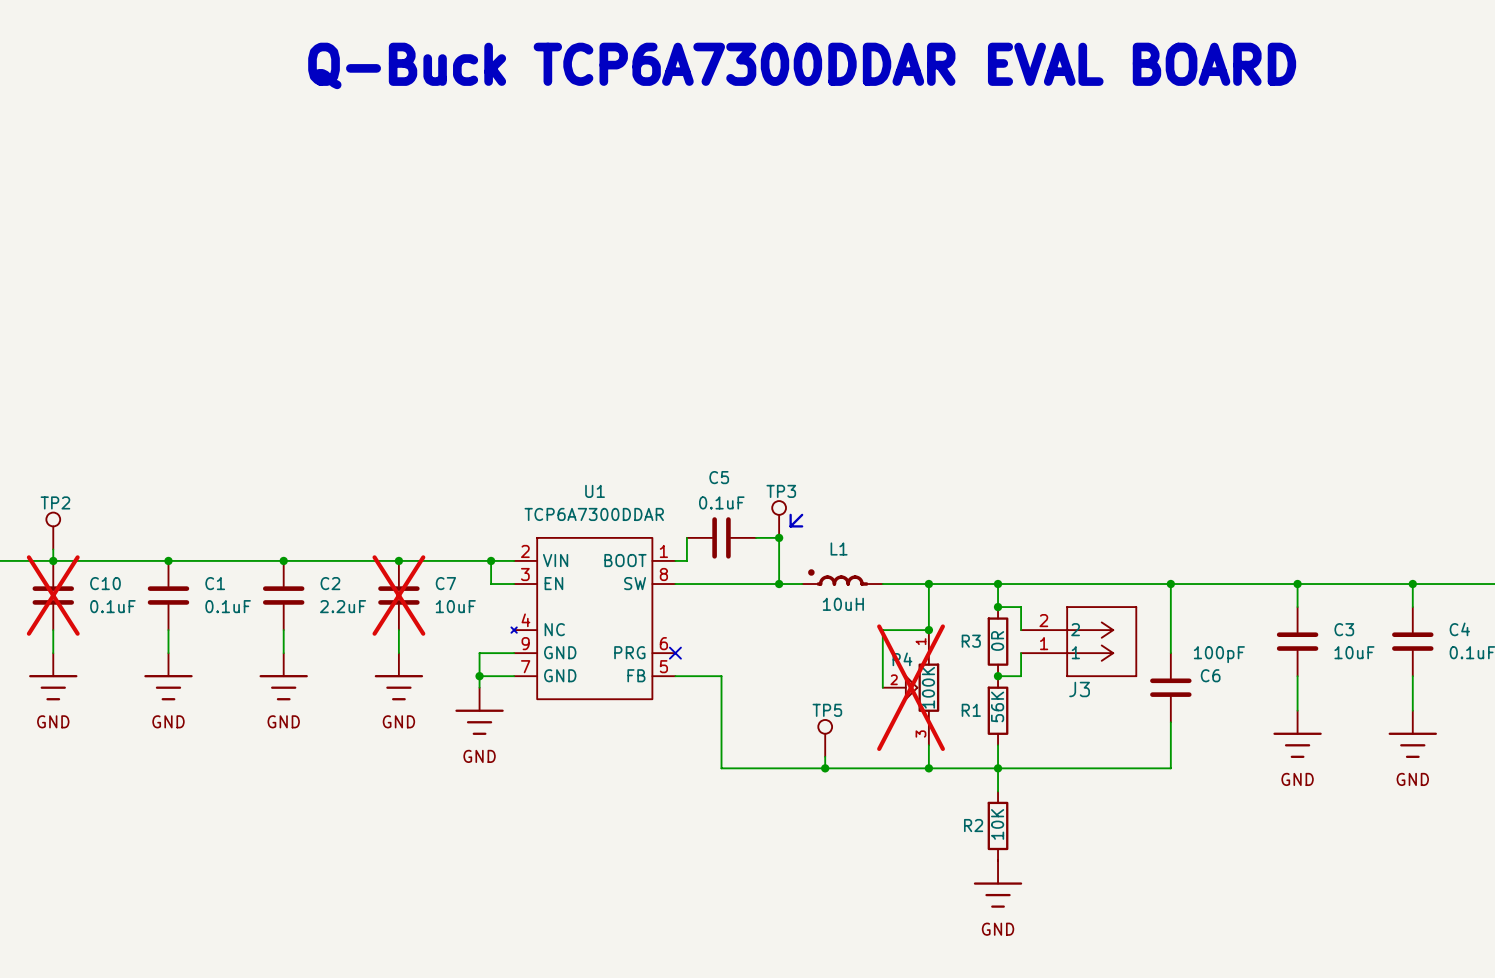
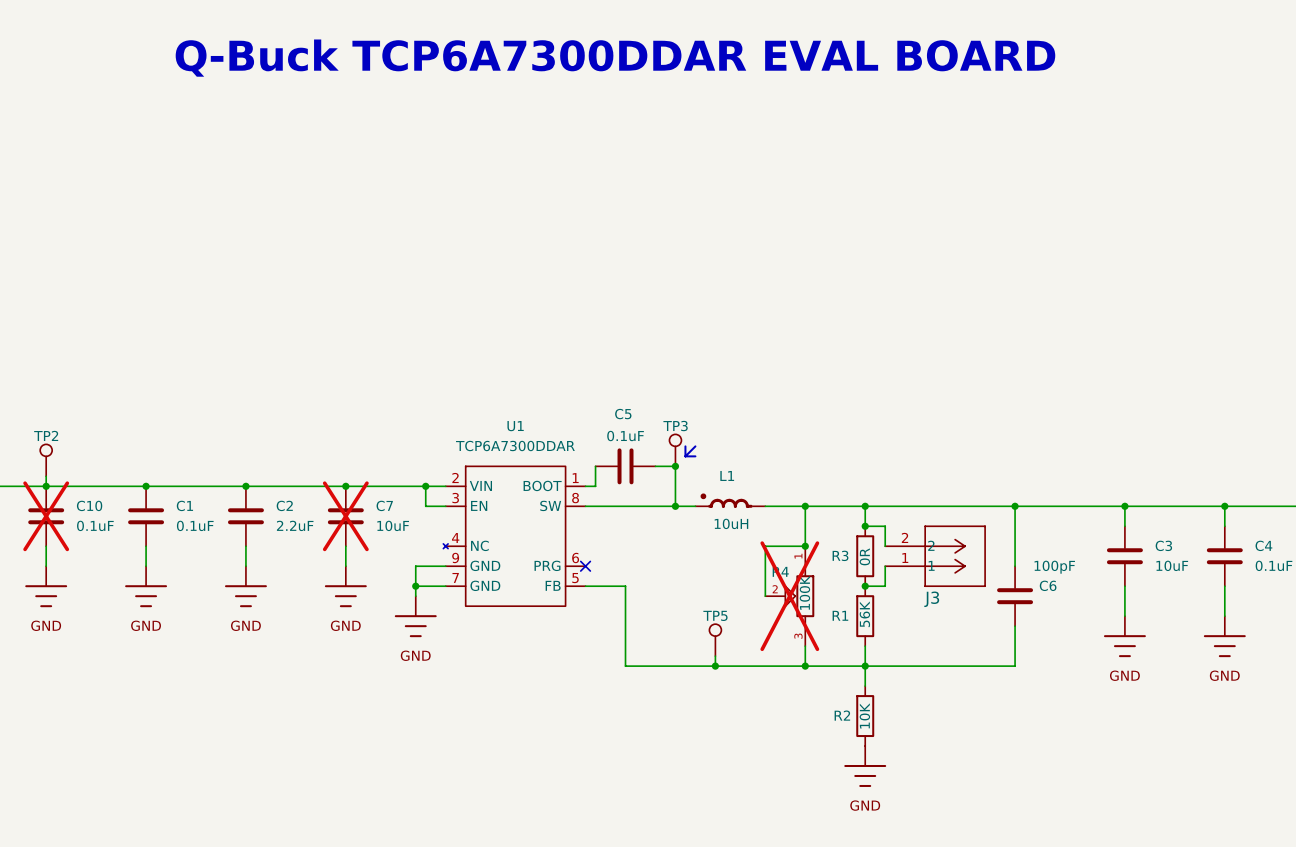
text position: Q-Buck TCP6A7300DDAR EVAL BOARD (802, 65) -> Q-Buck TCP6A7300DDAR EVAL BOARD (615, 58)

